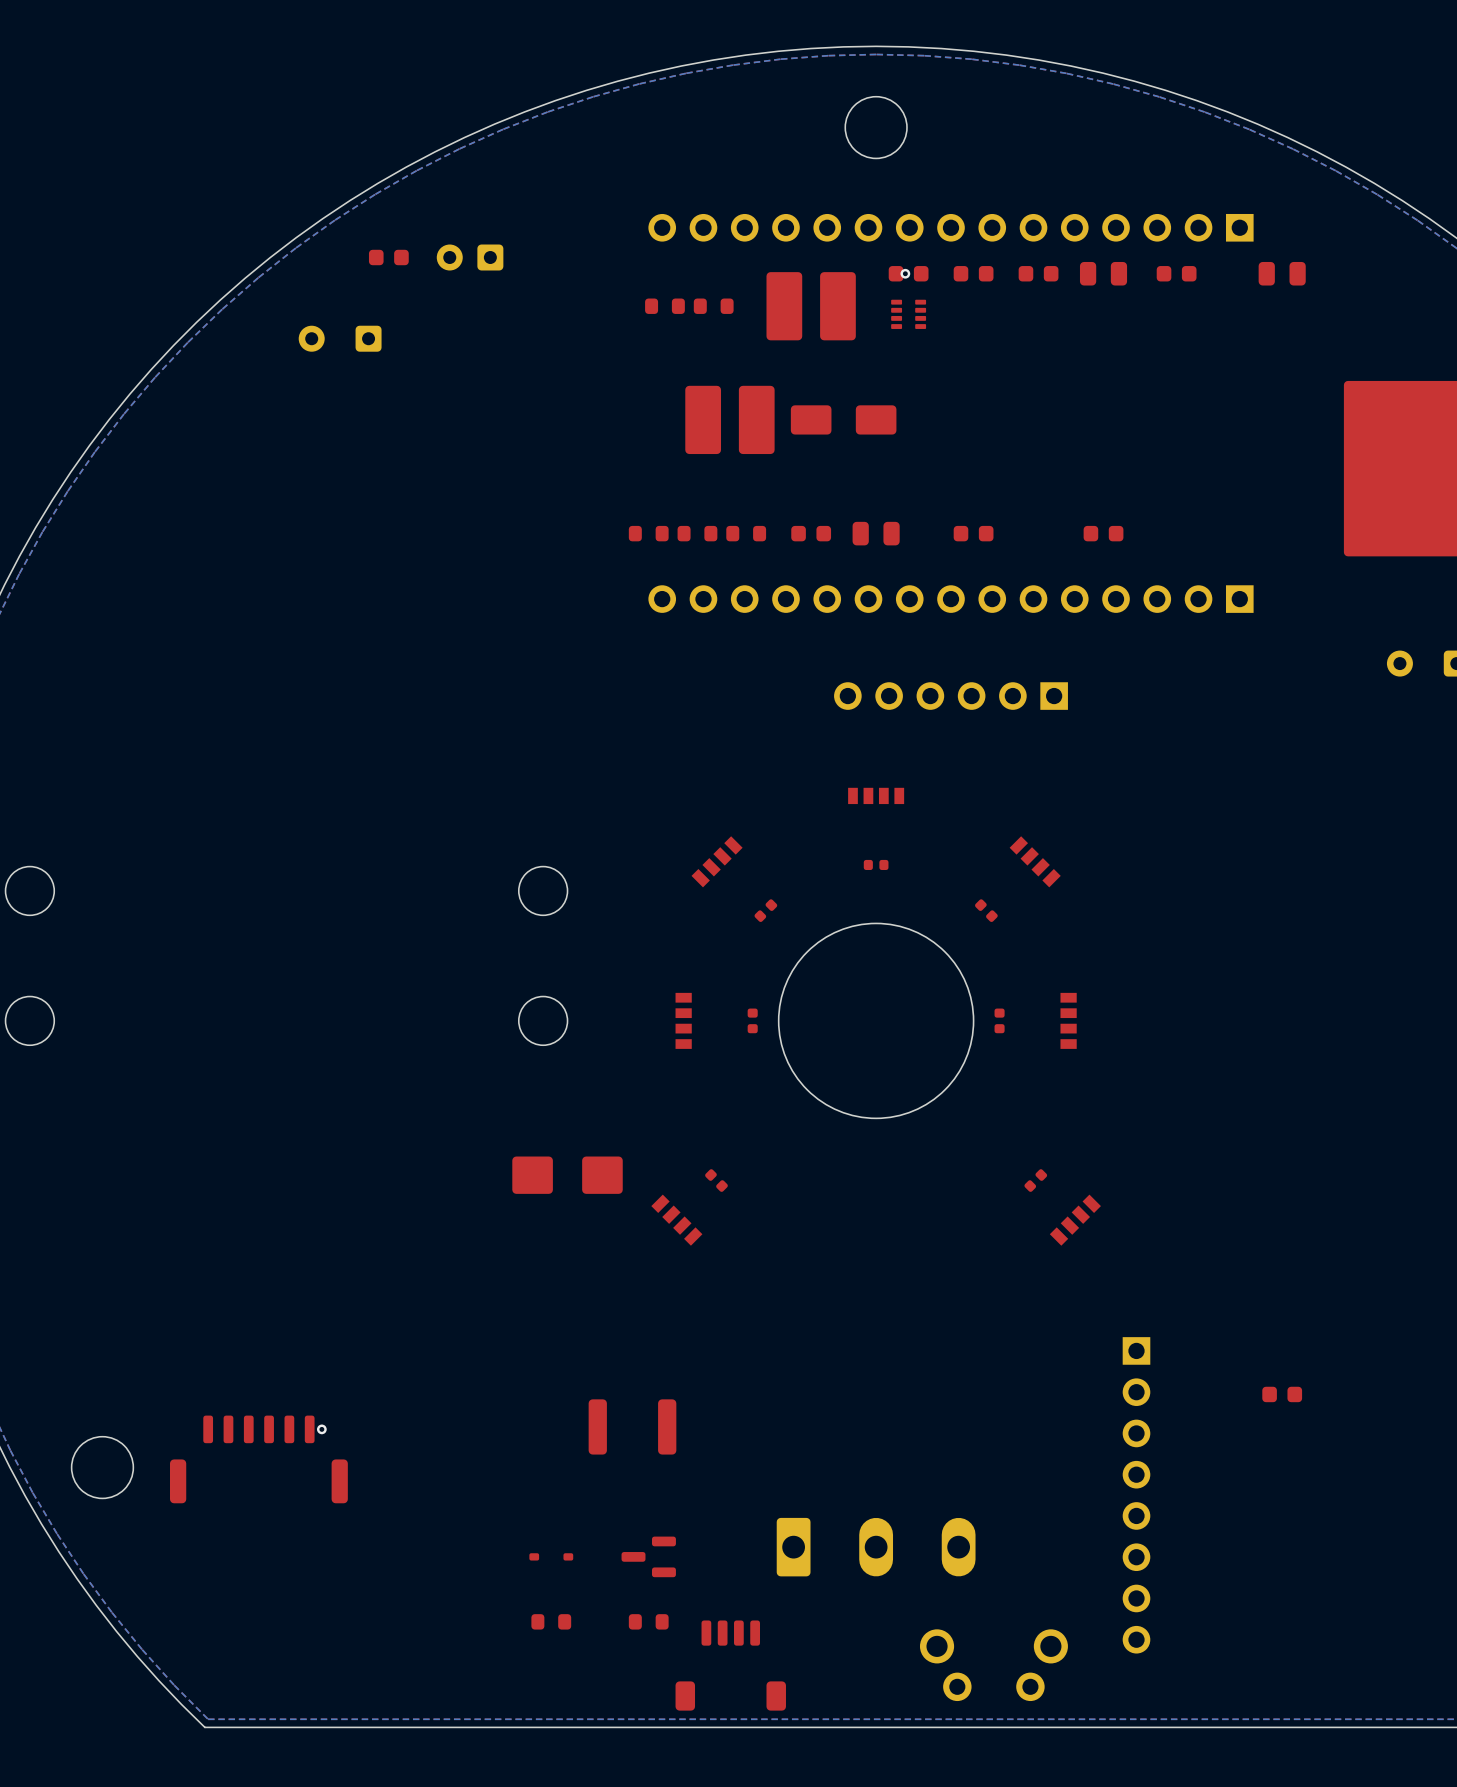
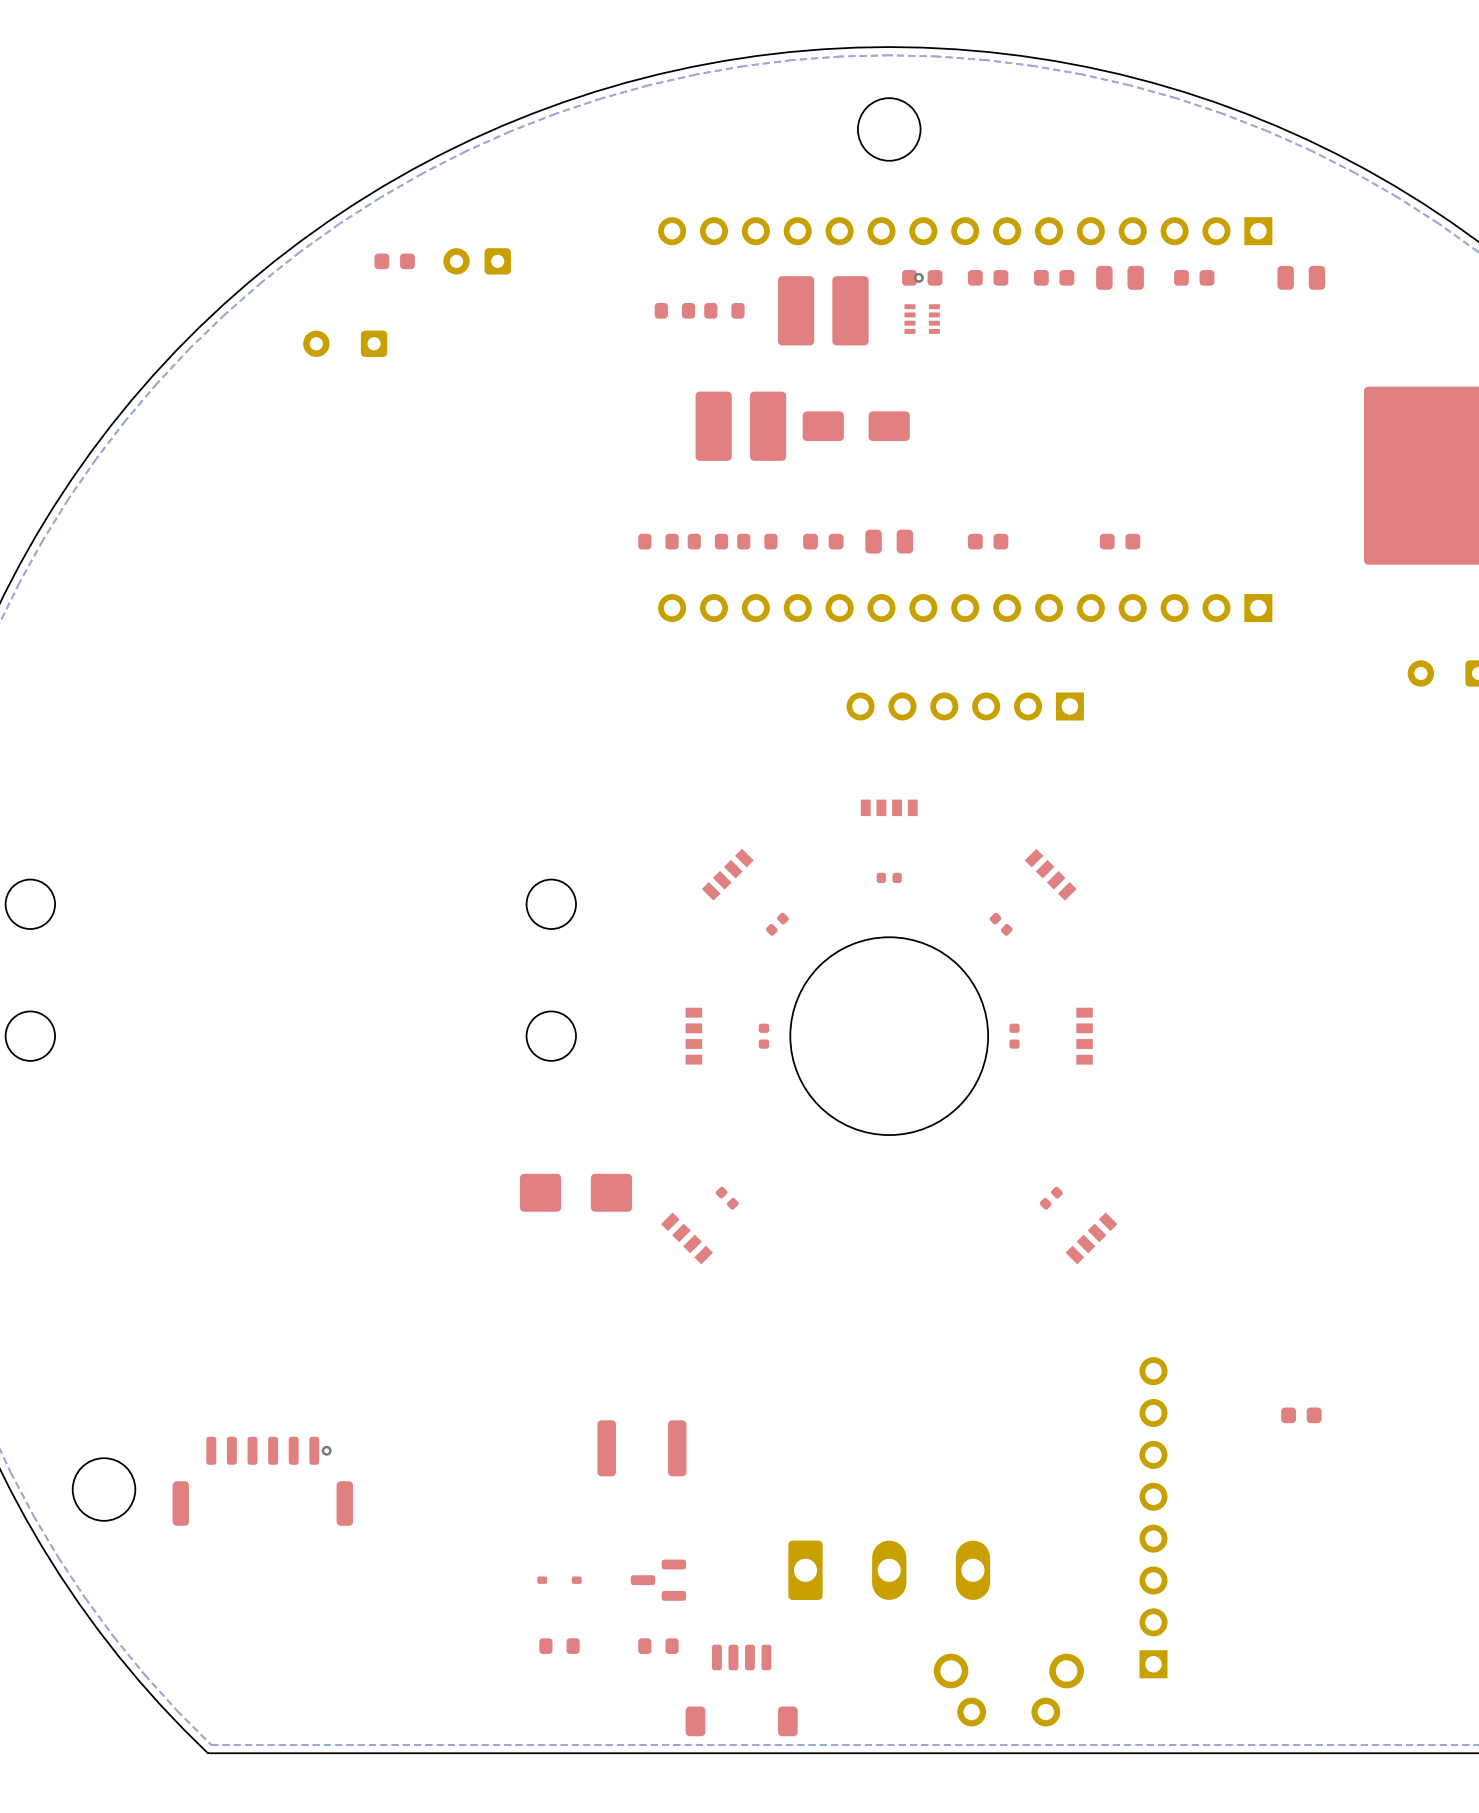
part rotation: 0° (1136, 1495) -> 180° (1153, 1517)

